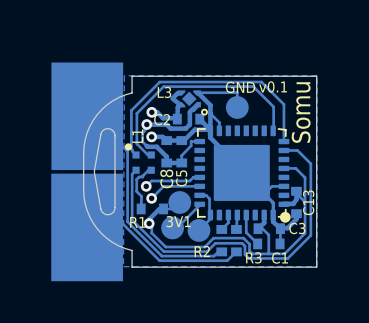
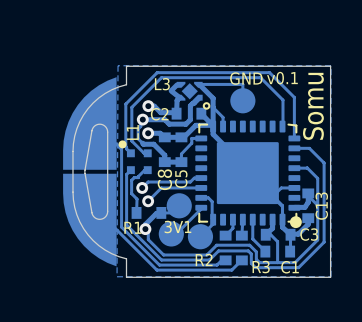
part: (87, 116) -> none
part: none -> (89, 171)
part: (87, 227) -> none

